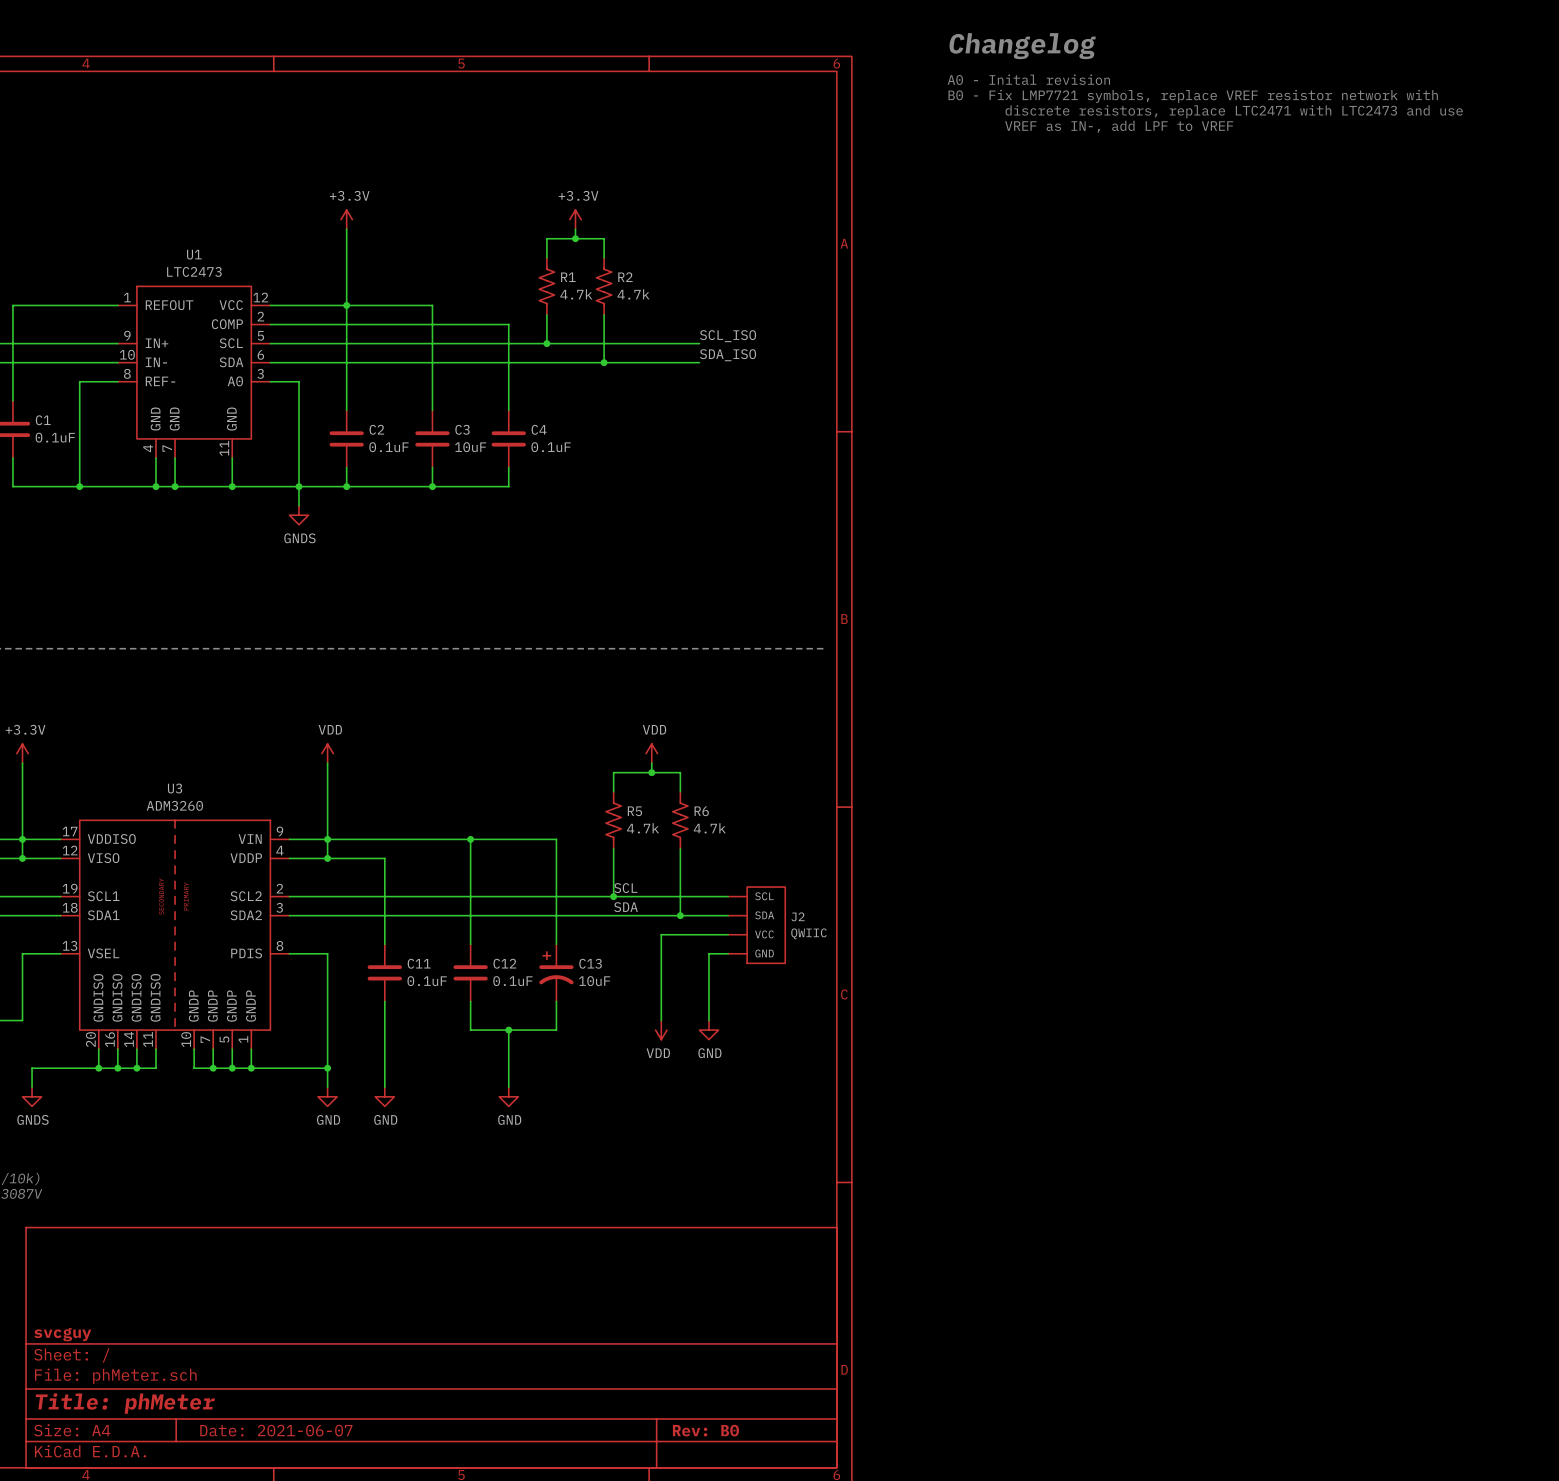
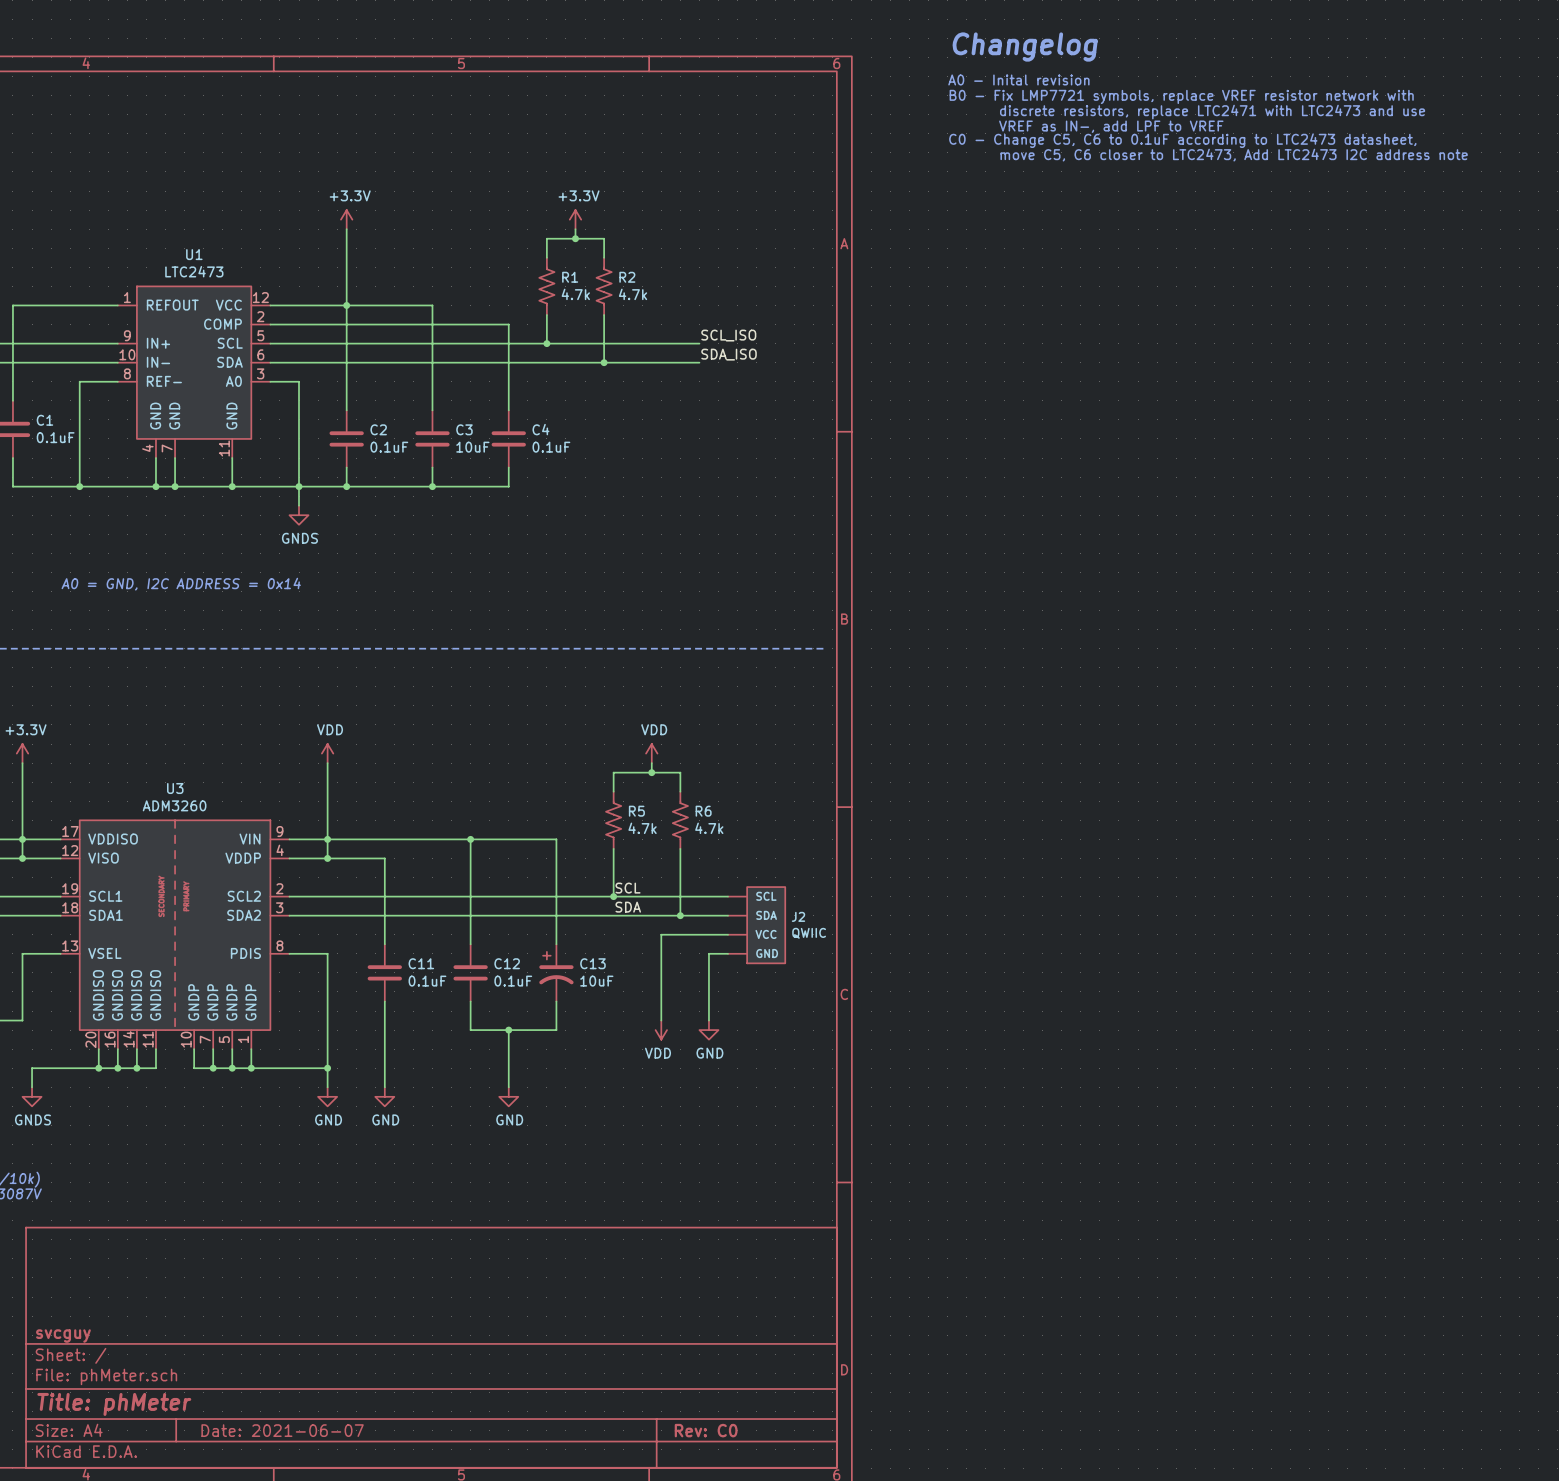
text: none -> C0 - Change C5, C6 to 0.1uF according to LTC2473 datasheet, (1182, 140)
text: none -> move C5, C6 closer to LTC2473, Add LTC2473 I2C address note (1234, 155)
text: none -> A0 = GND, I2C ADDRESS = 0x14 (181, 584)
title block: Rev: B0 (705, 1430) -> Rev: C0 (706, 1430)

